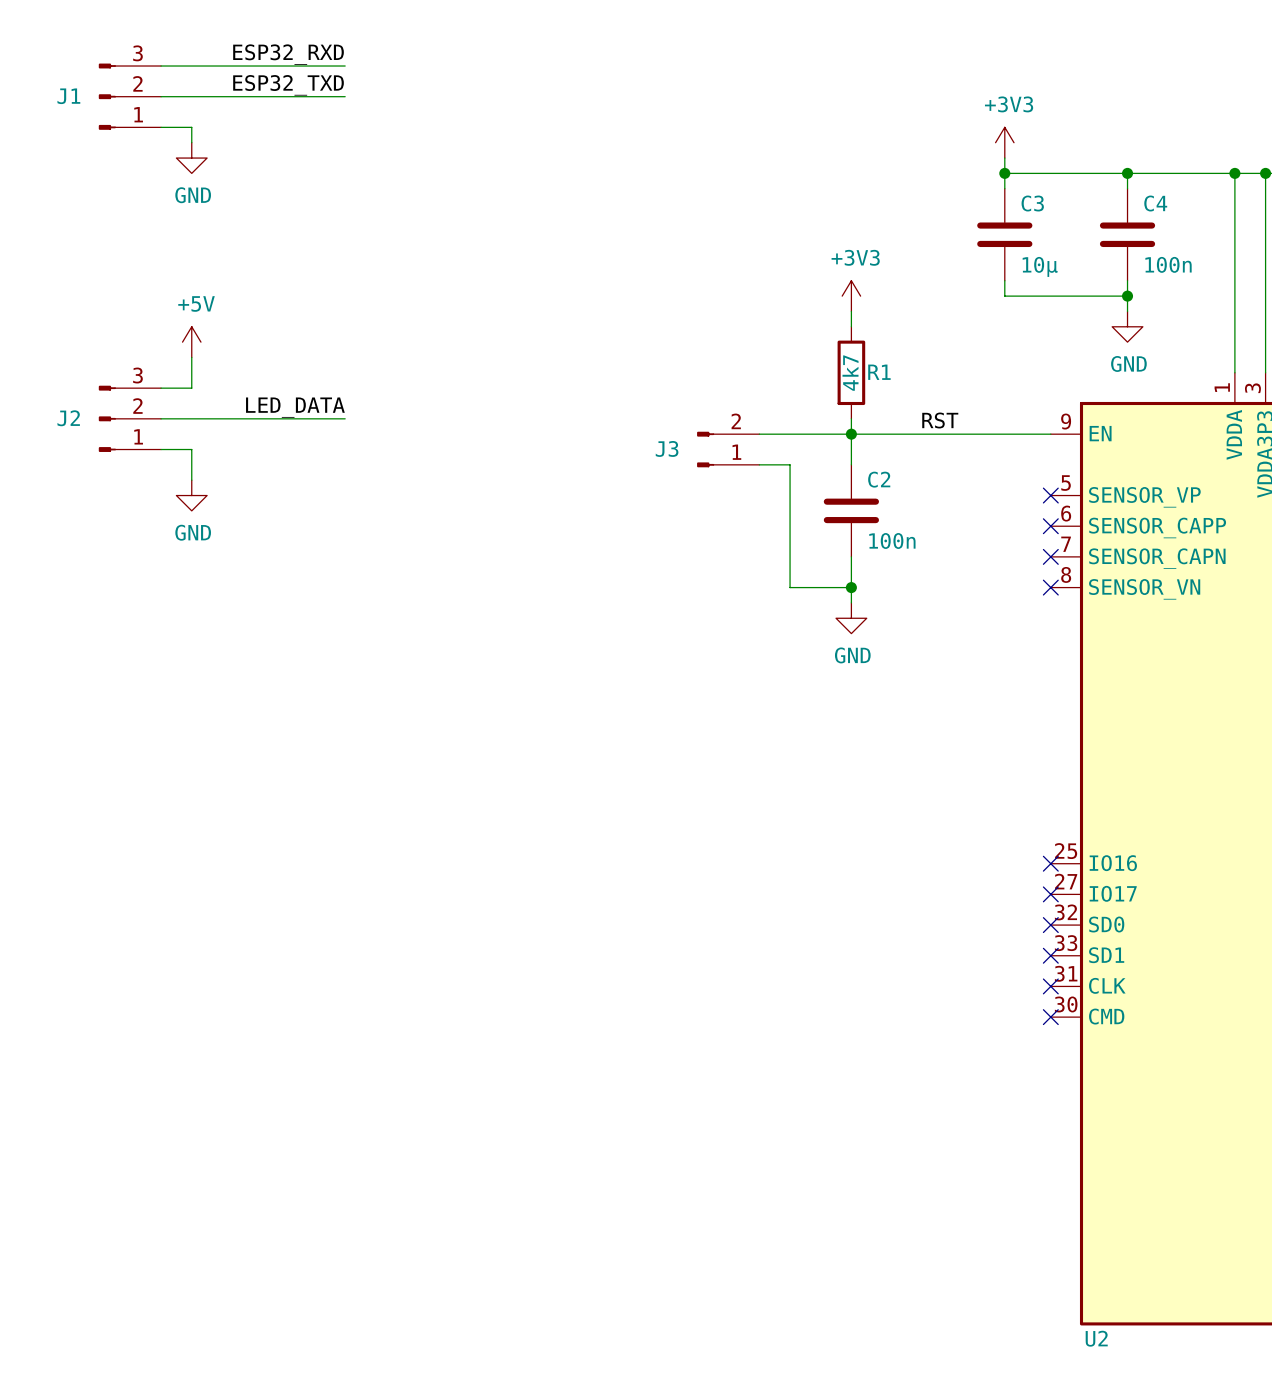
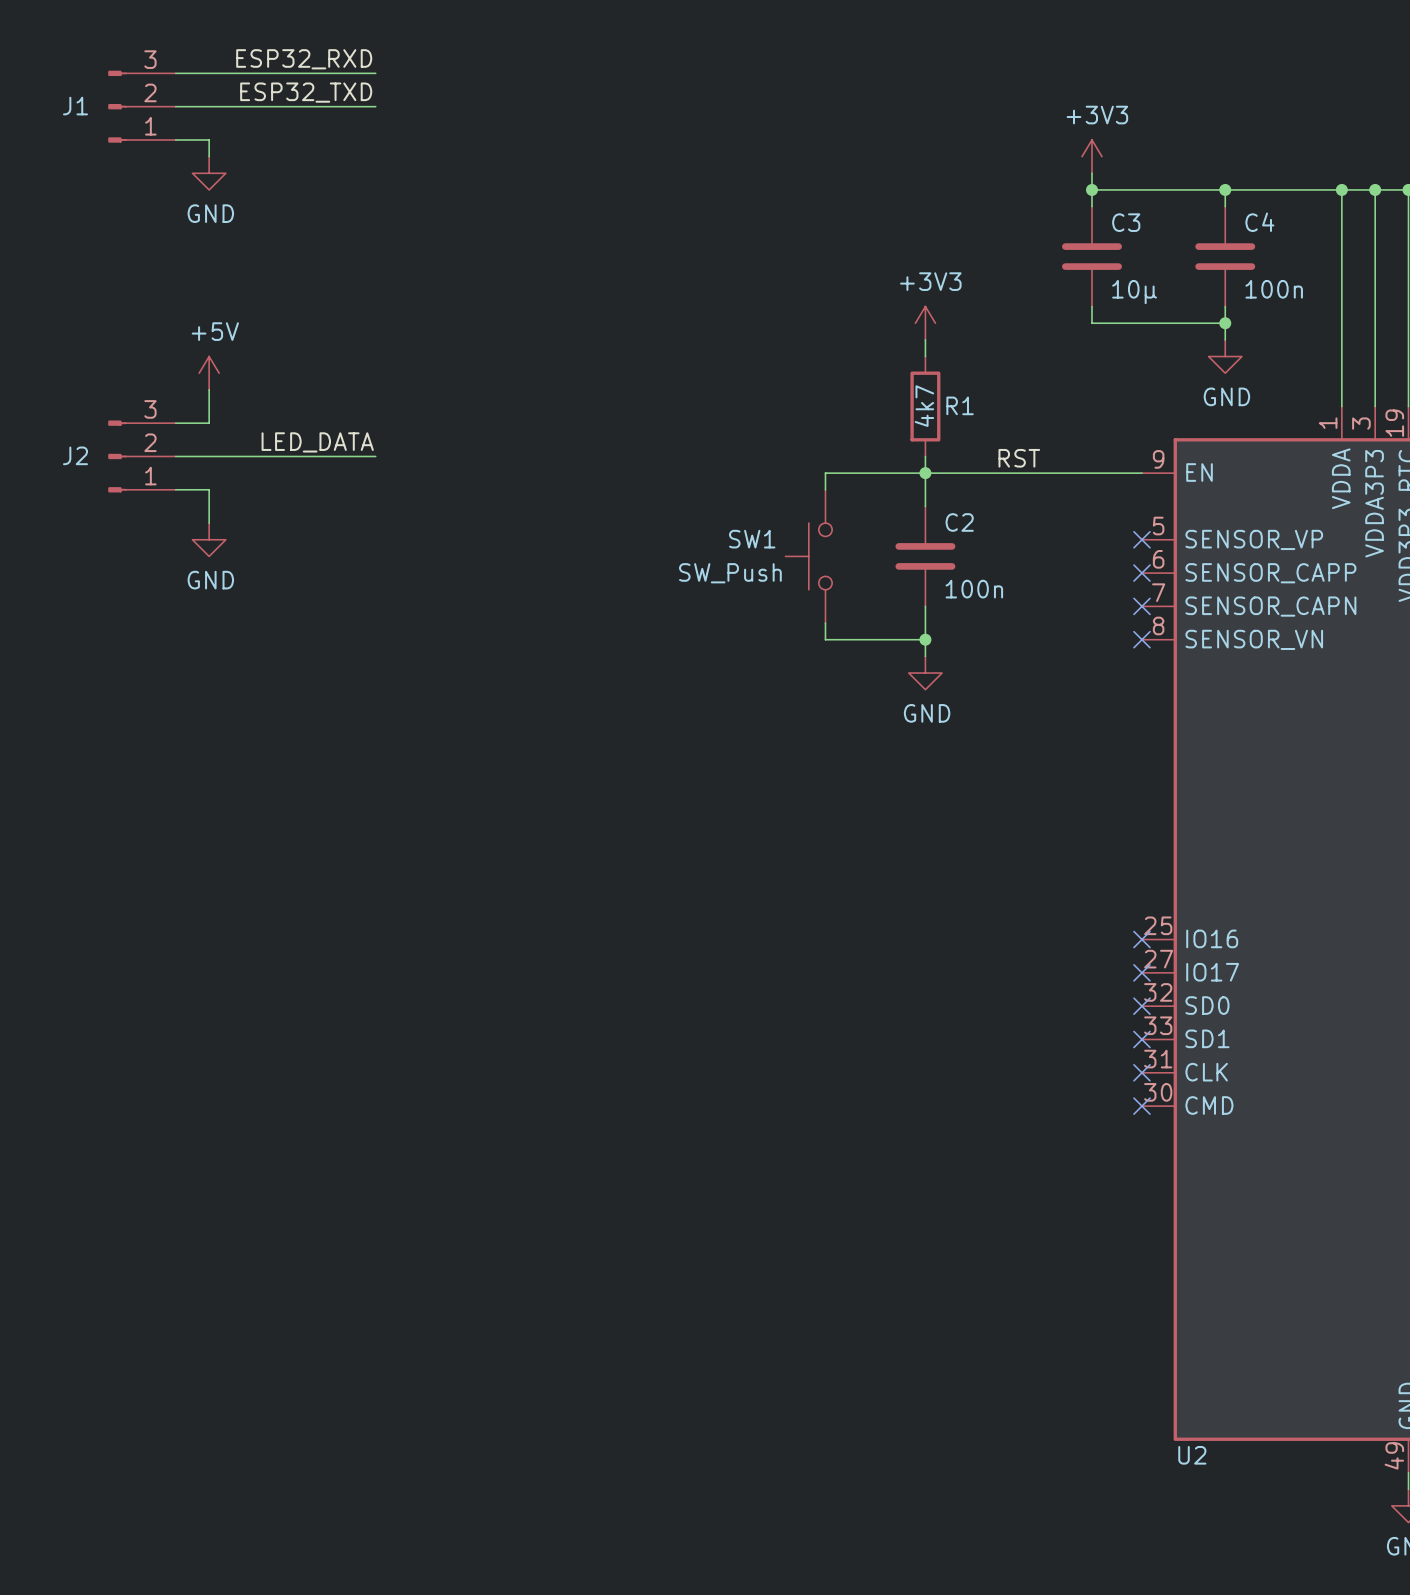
wire: none -> (825, 473) (825, 489)
J3: (728, 449) -> none
wire: (759, 464) (790, 464) (790, 587) -> (825, 623) (825, 639) (858, 639)
SW1: none -> SW_Push (808, 556)

